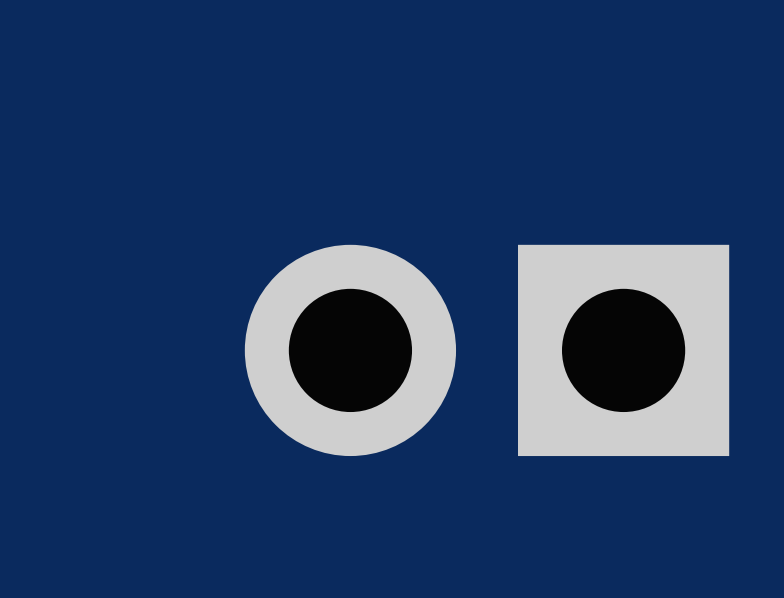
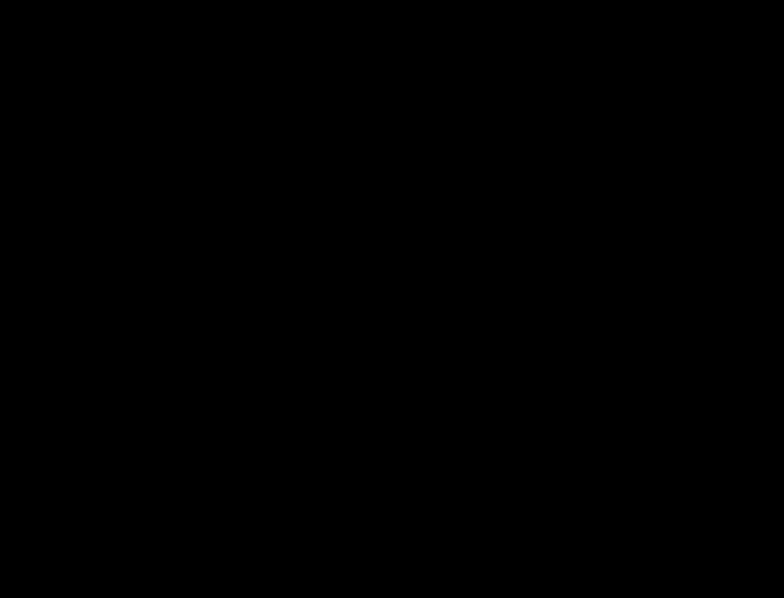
part: (487, 350) -> none

